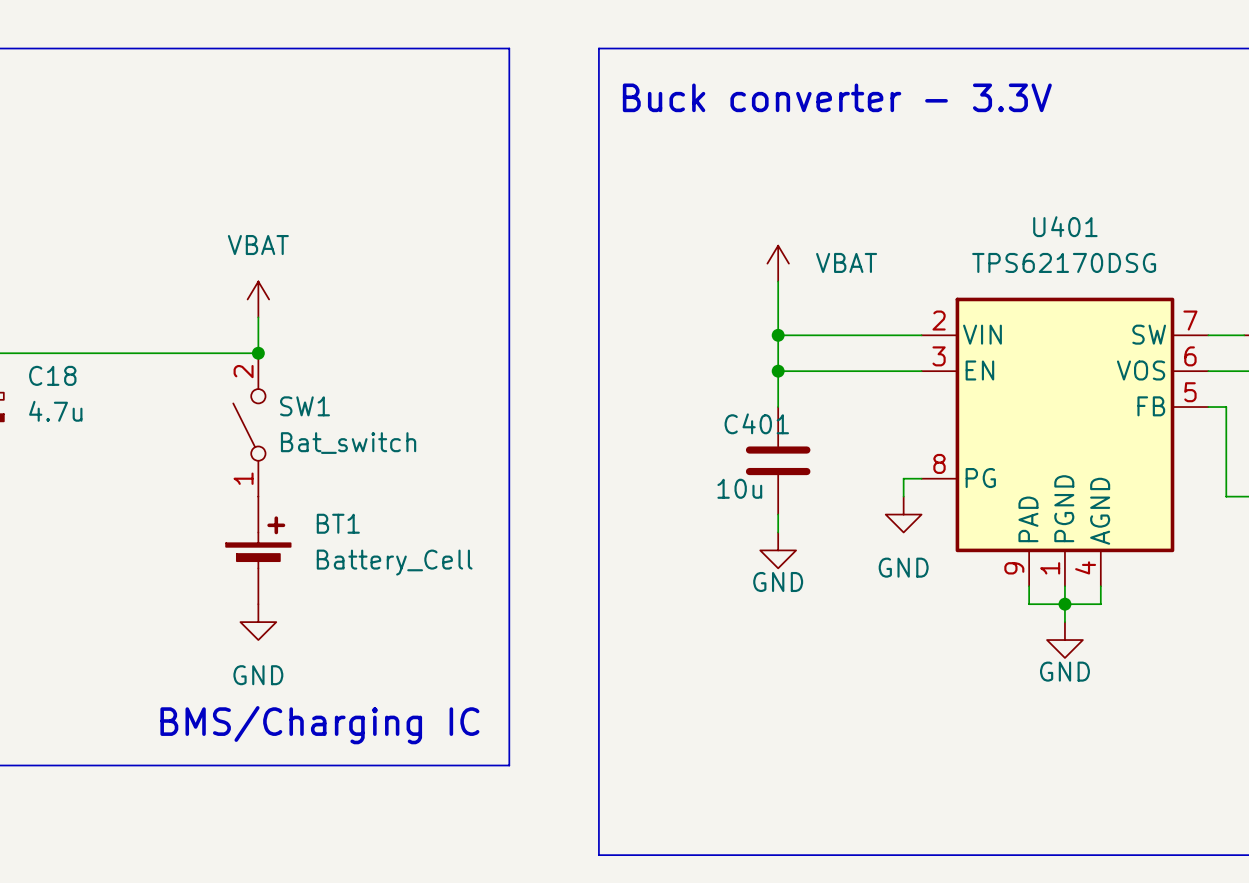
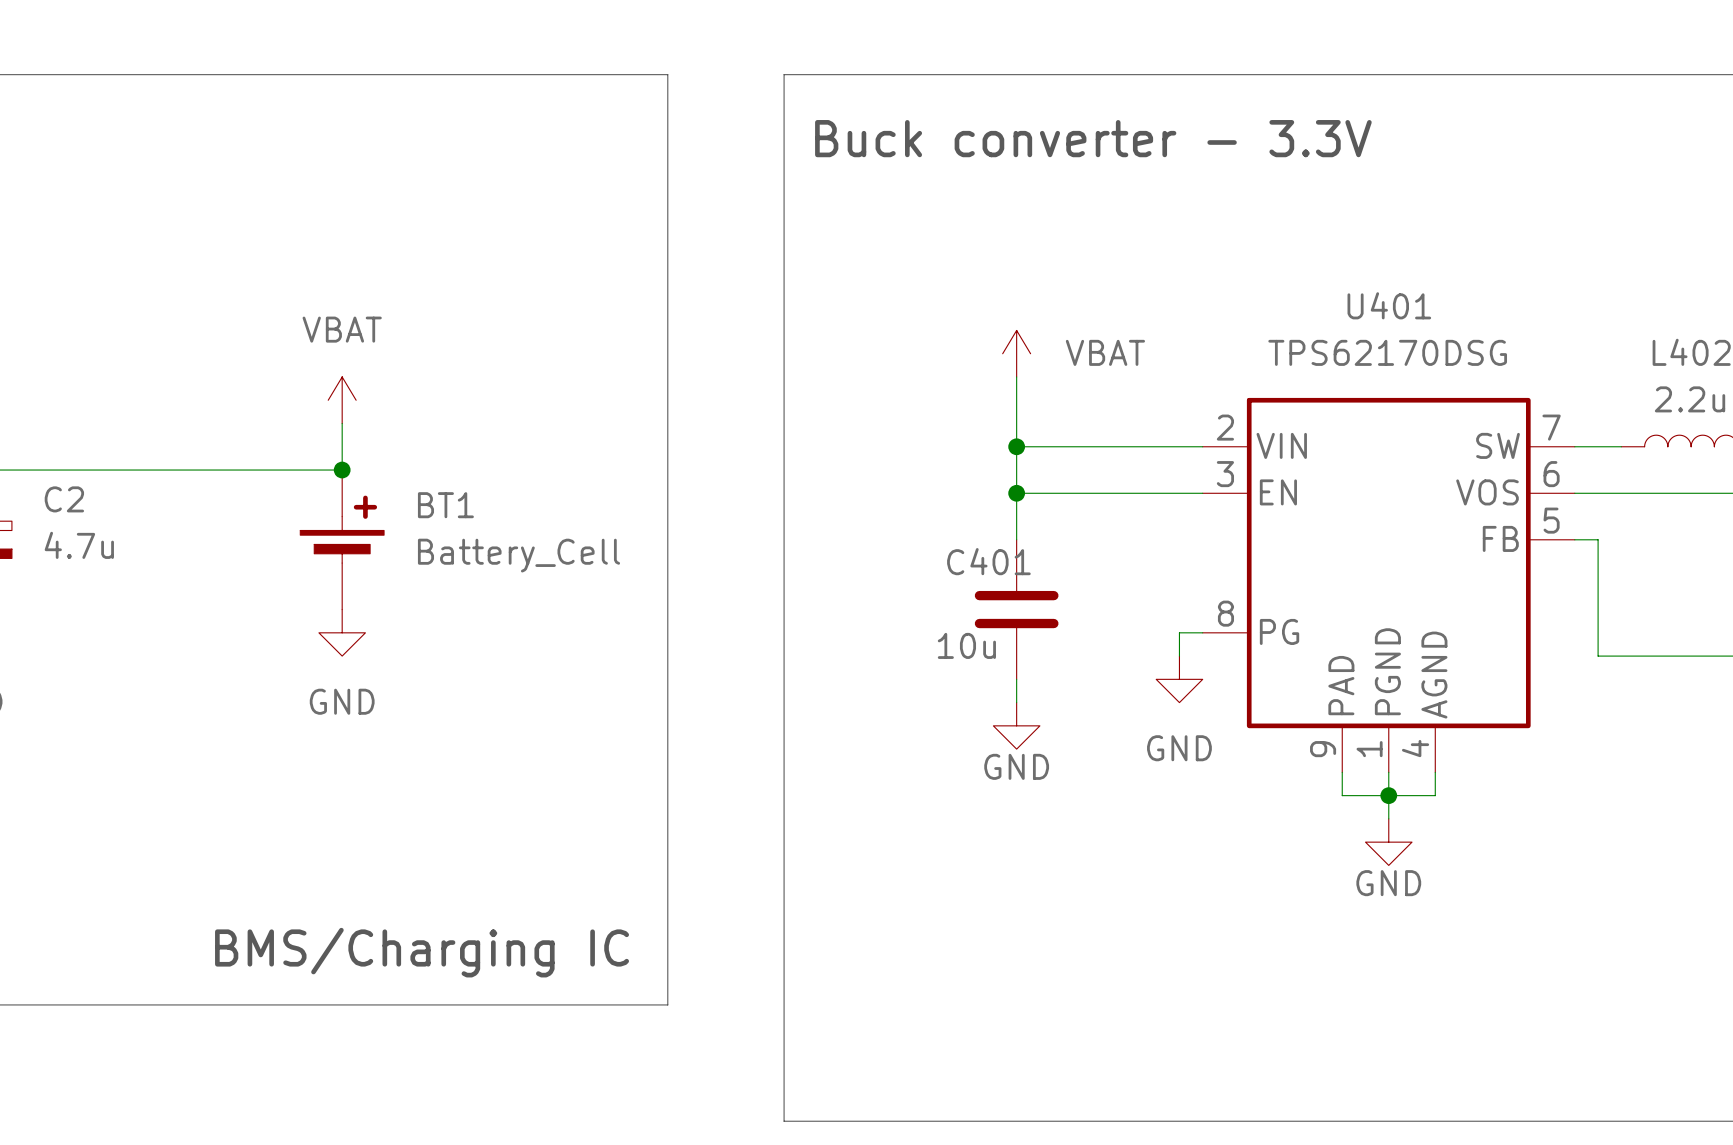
C18 name: C18 (52, 375) -> C2 (64, 499)
SW1: Bat_switch (249, 424) -> none
BT1 position: (258, 550) -> (342, 539)
power symbol position: GND (258, 622) -> GND (342, 632)

